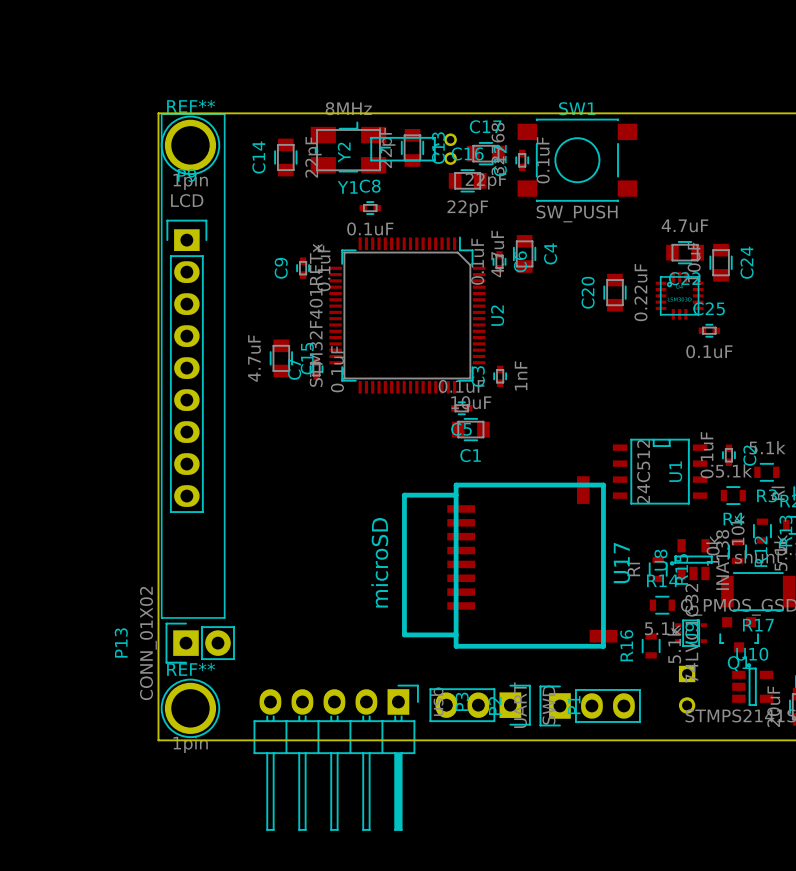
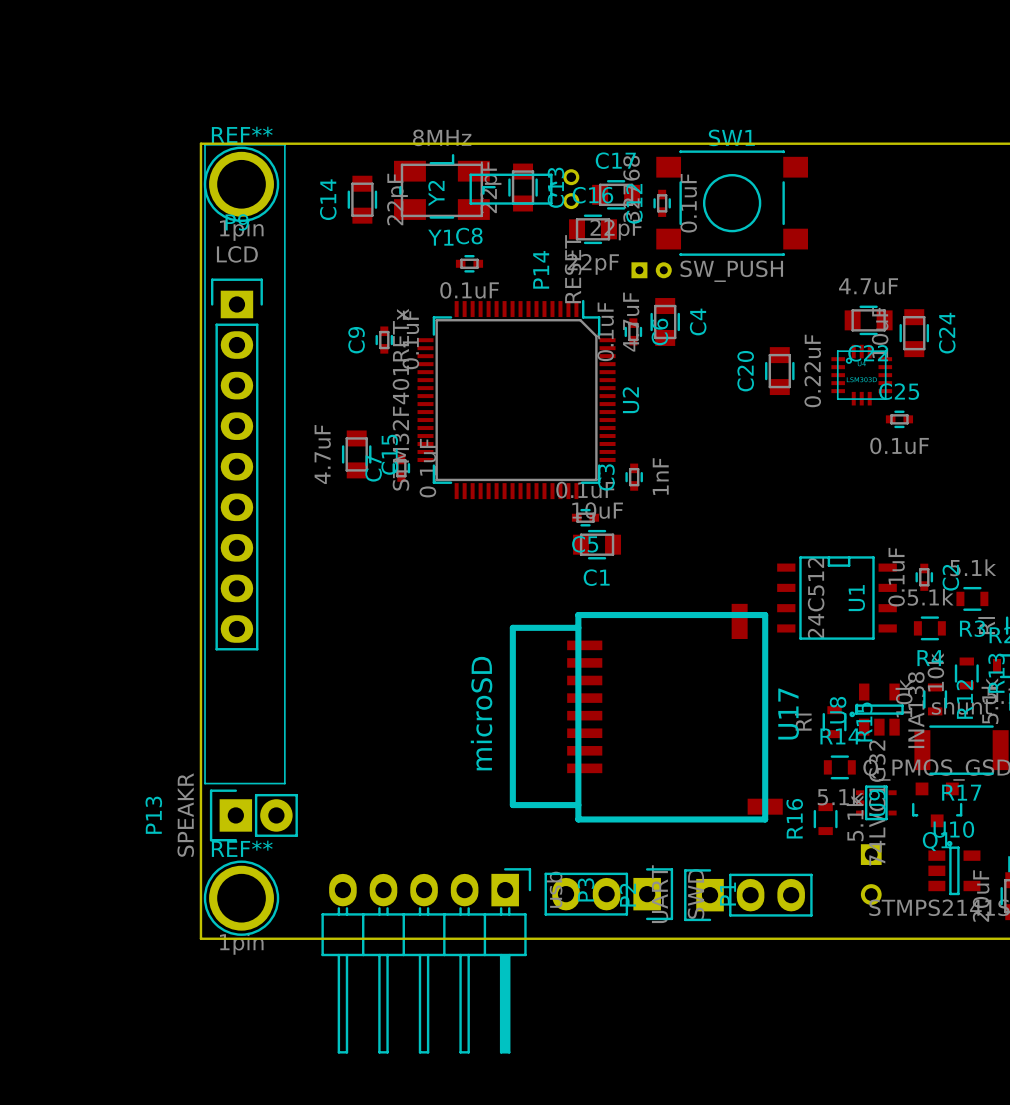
P14: none -> RESET (651, 270)
P13 value: CONN_01X02 (148, 643) -> SPEAKR (185, 815)

